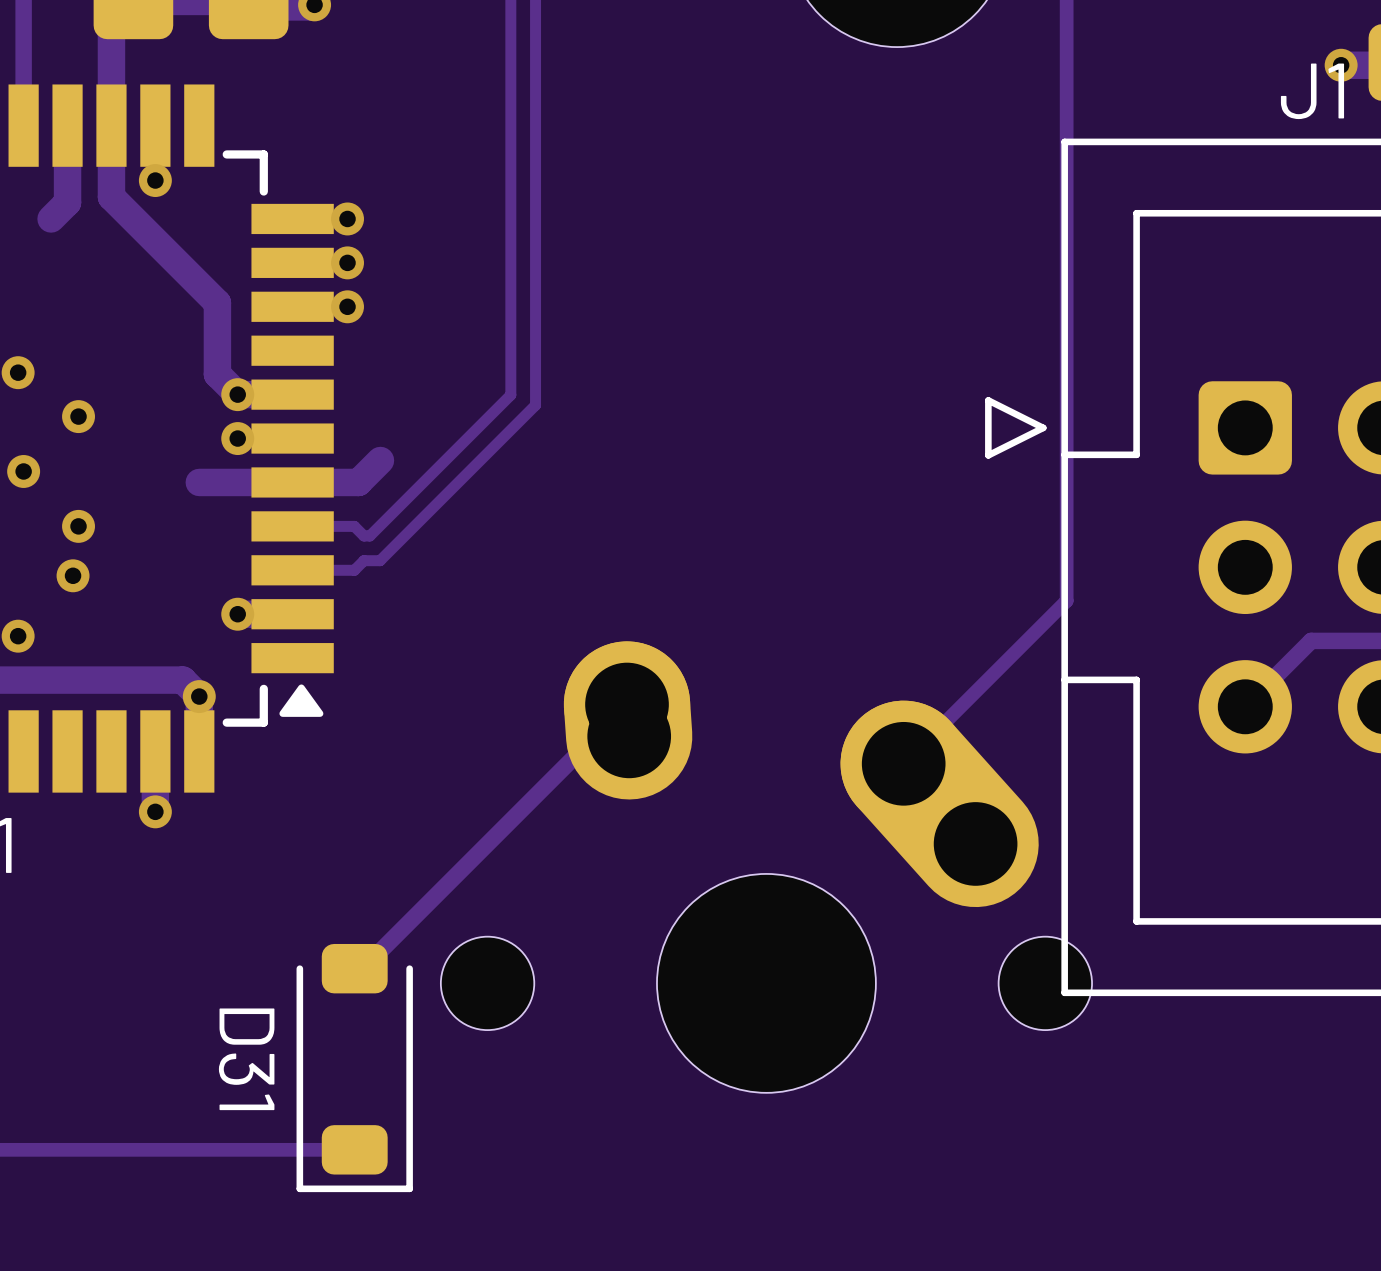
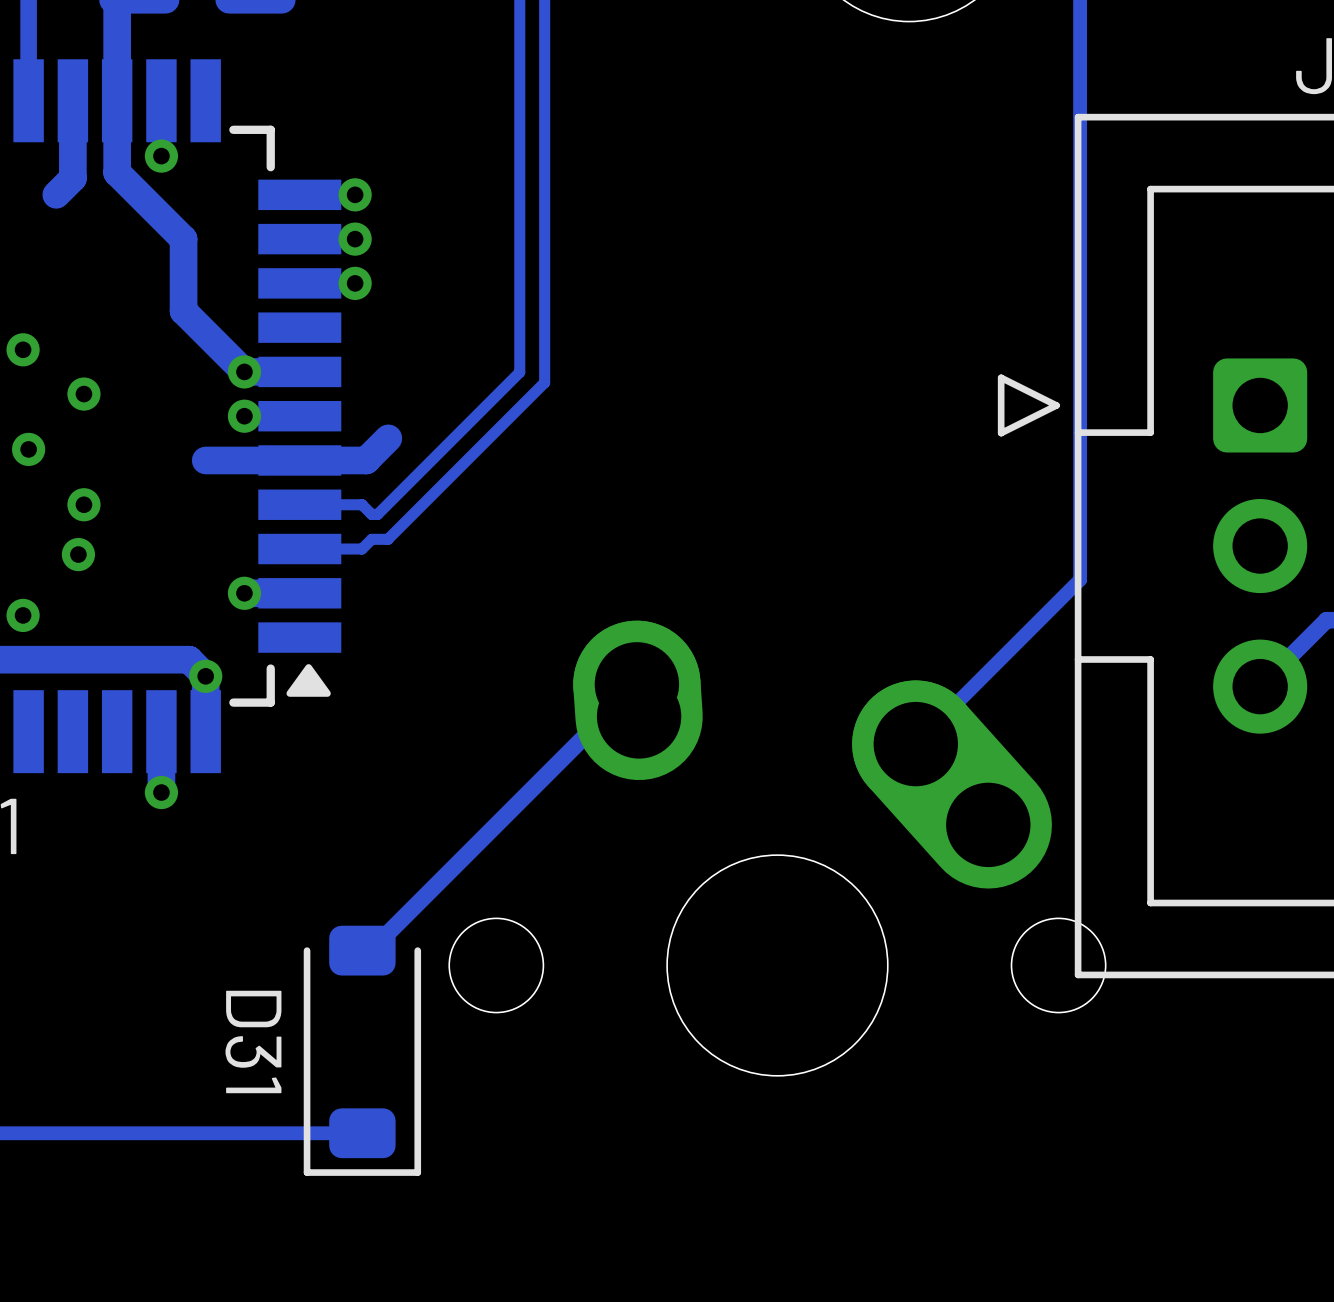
track: (177, 262) (217, 302) (217, 374) -> (183, 239) (183, 311) (223, 351)

